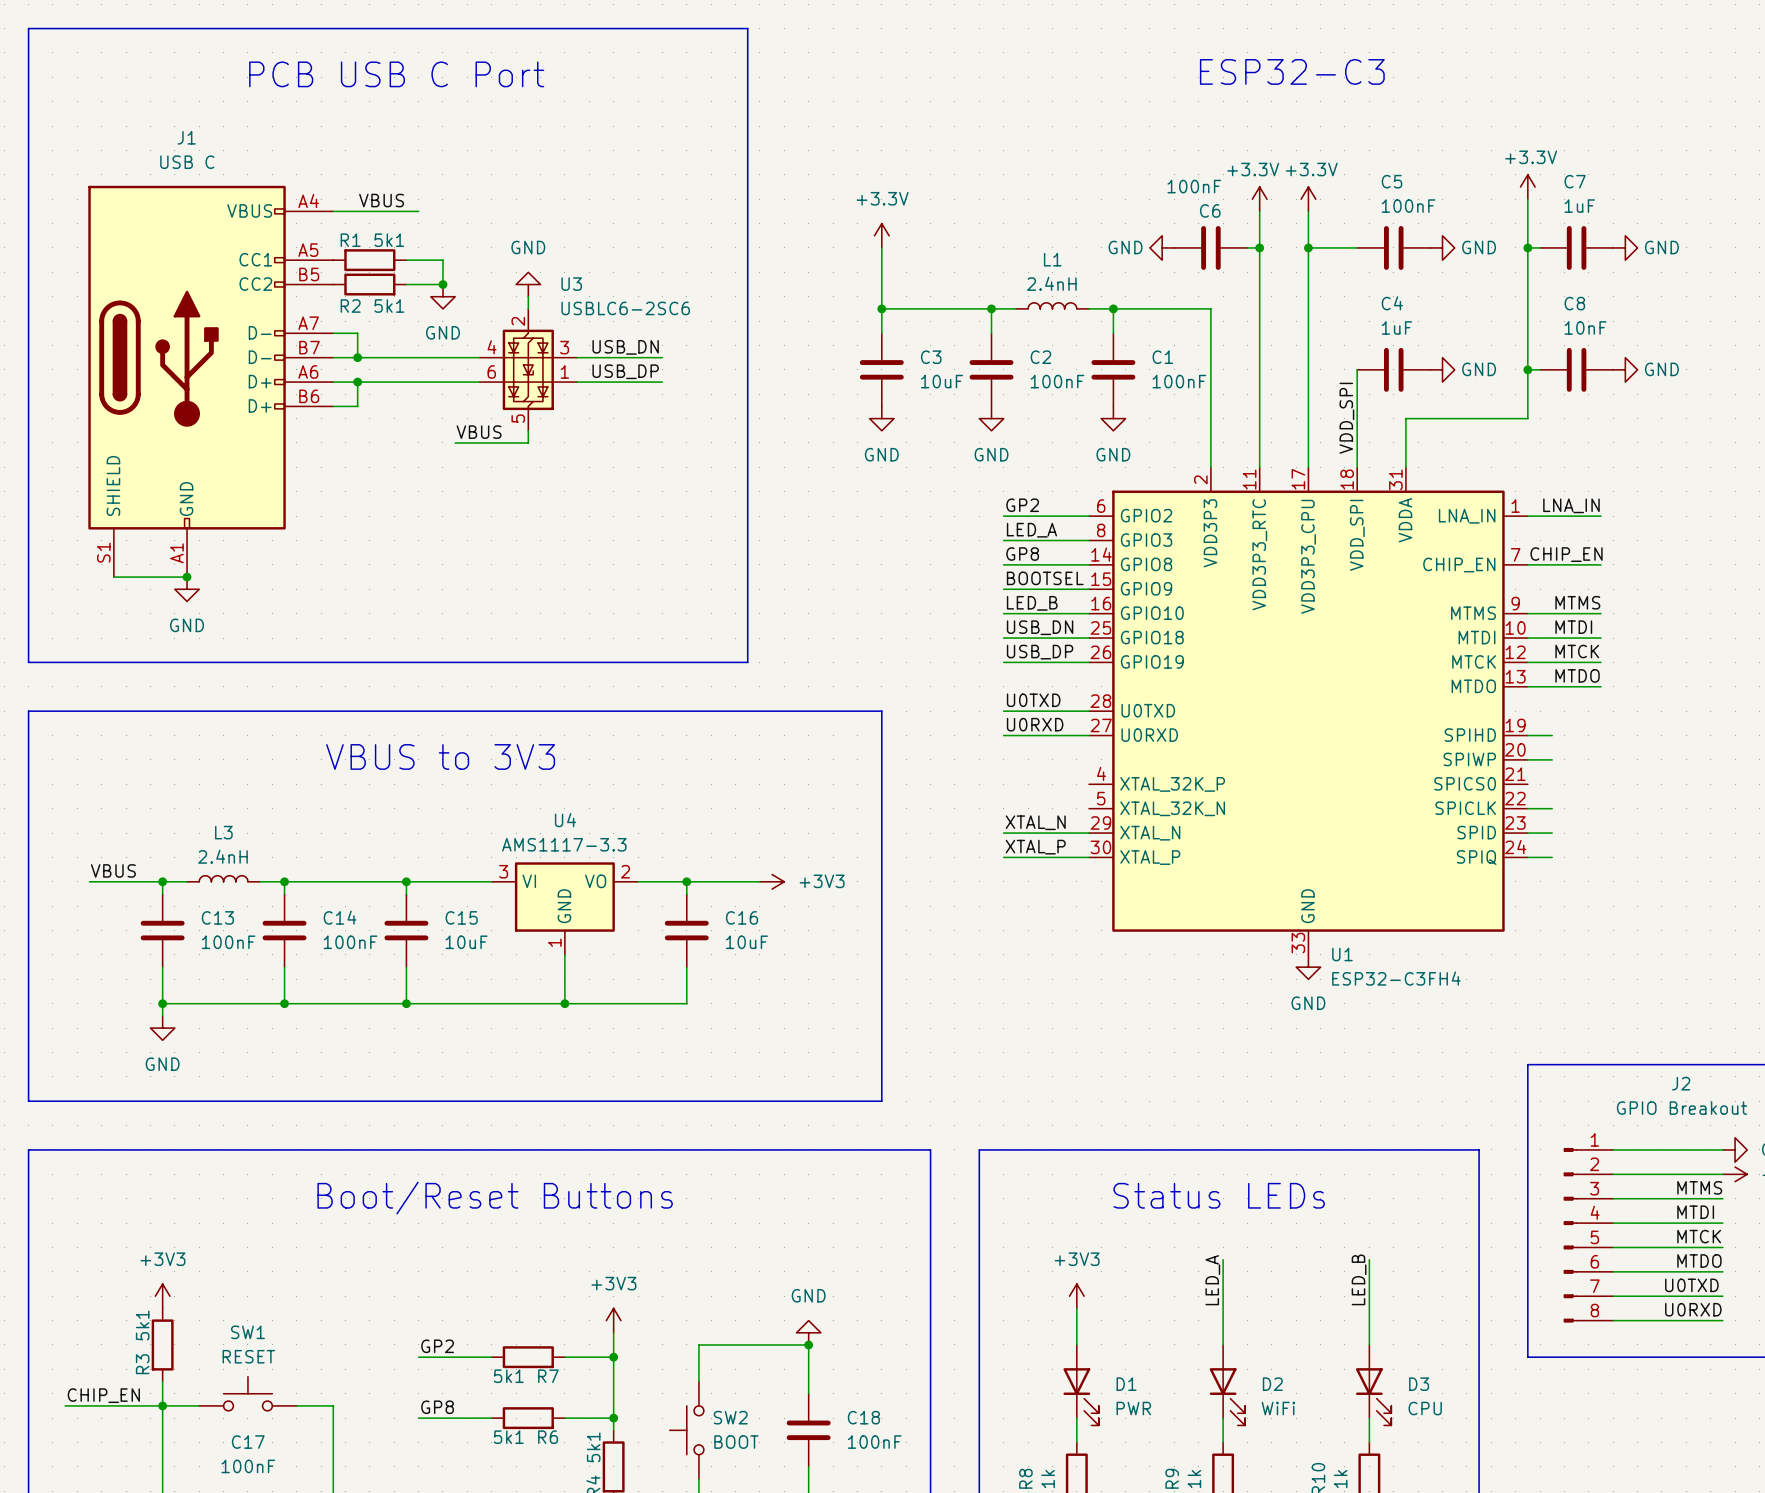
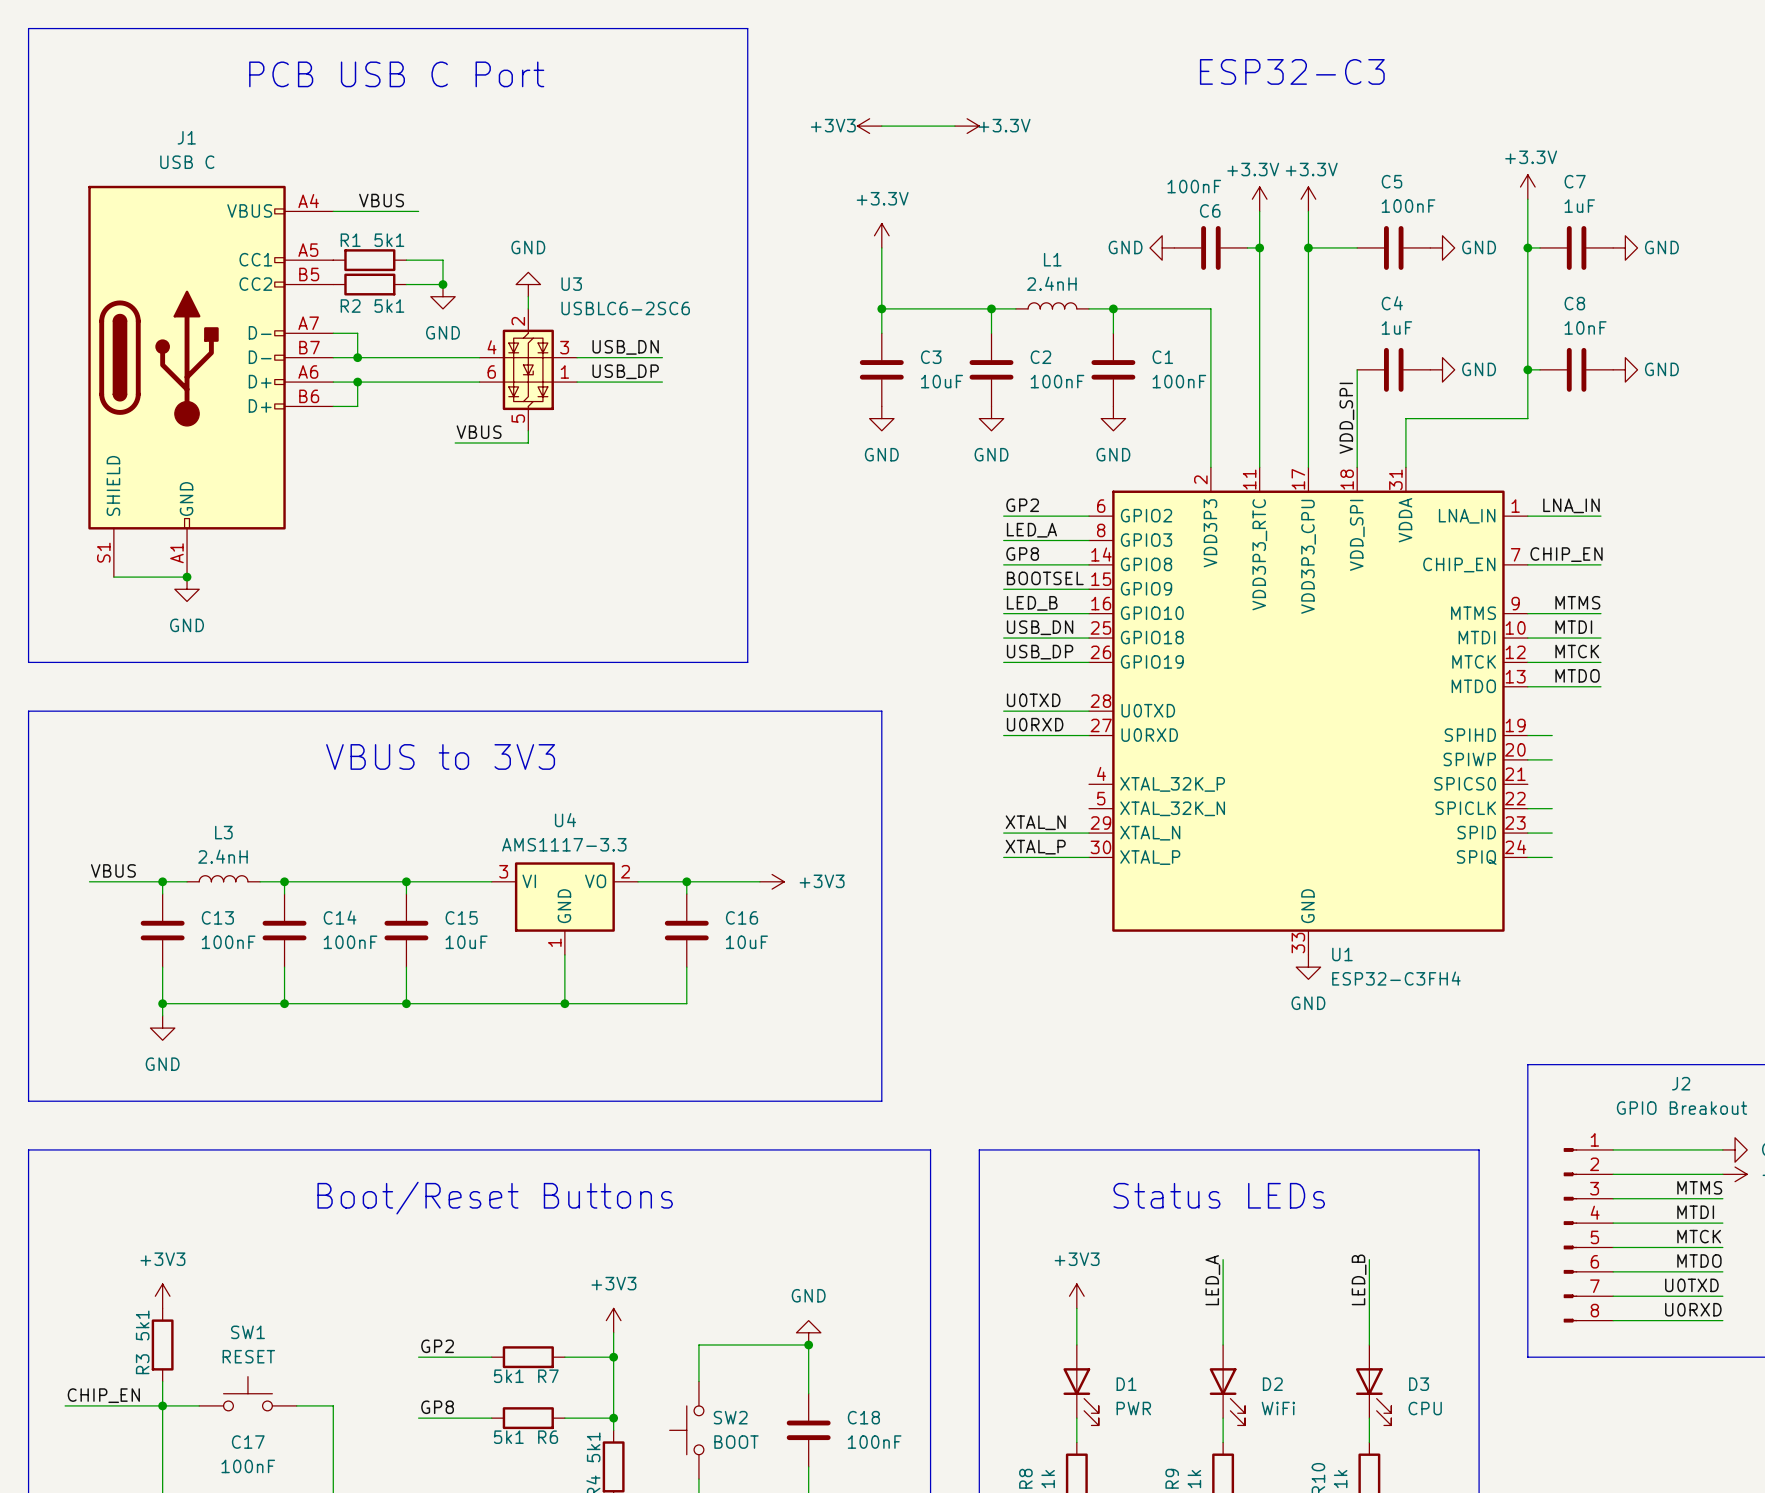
power symbol: none -> +3V3 (869, 126)
wire: none -> (881, 126) (954, 126)
power symbol: none -> +3.3V (967, 126)

